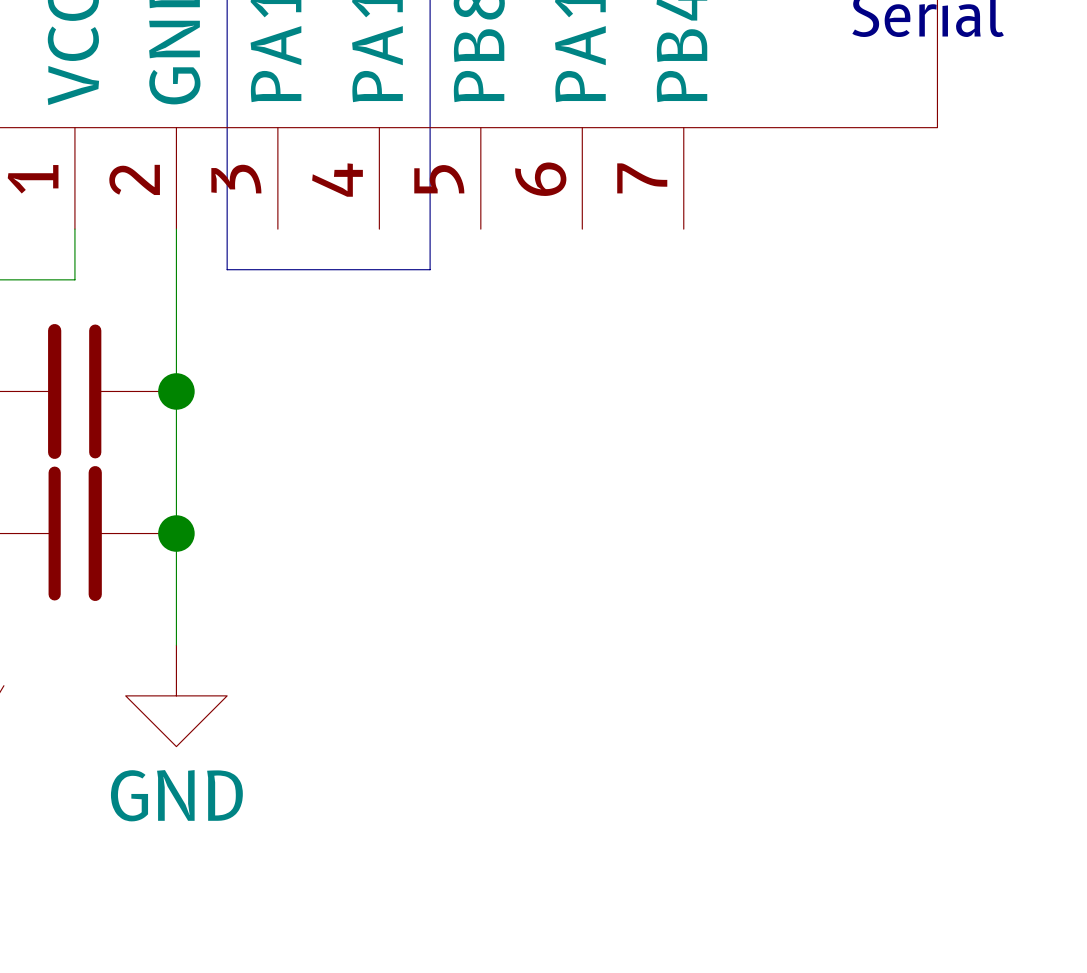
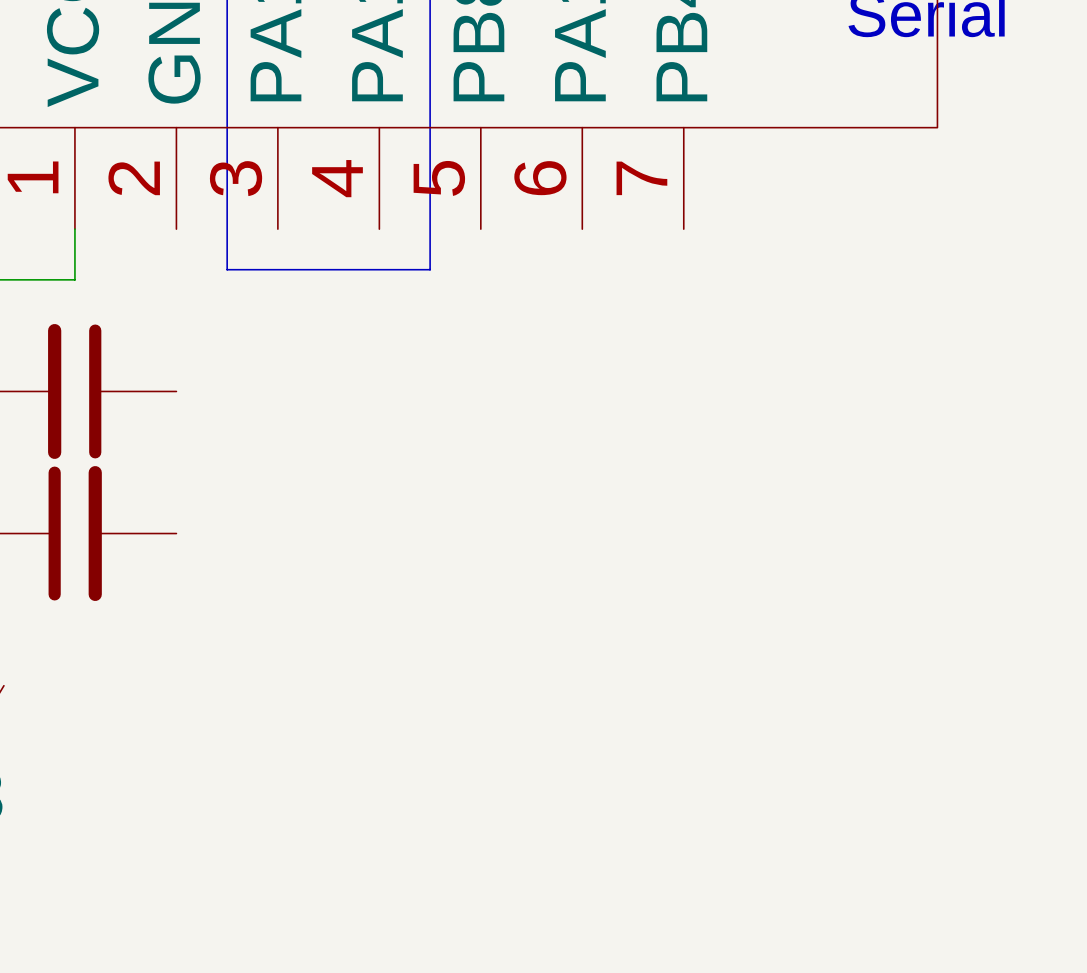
wire: (176, 229) (176, 645) -> none
junction: (176, 391) -> none
junction: (176, 533) -> none
power symbol: GND (176, 695) -> none

